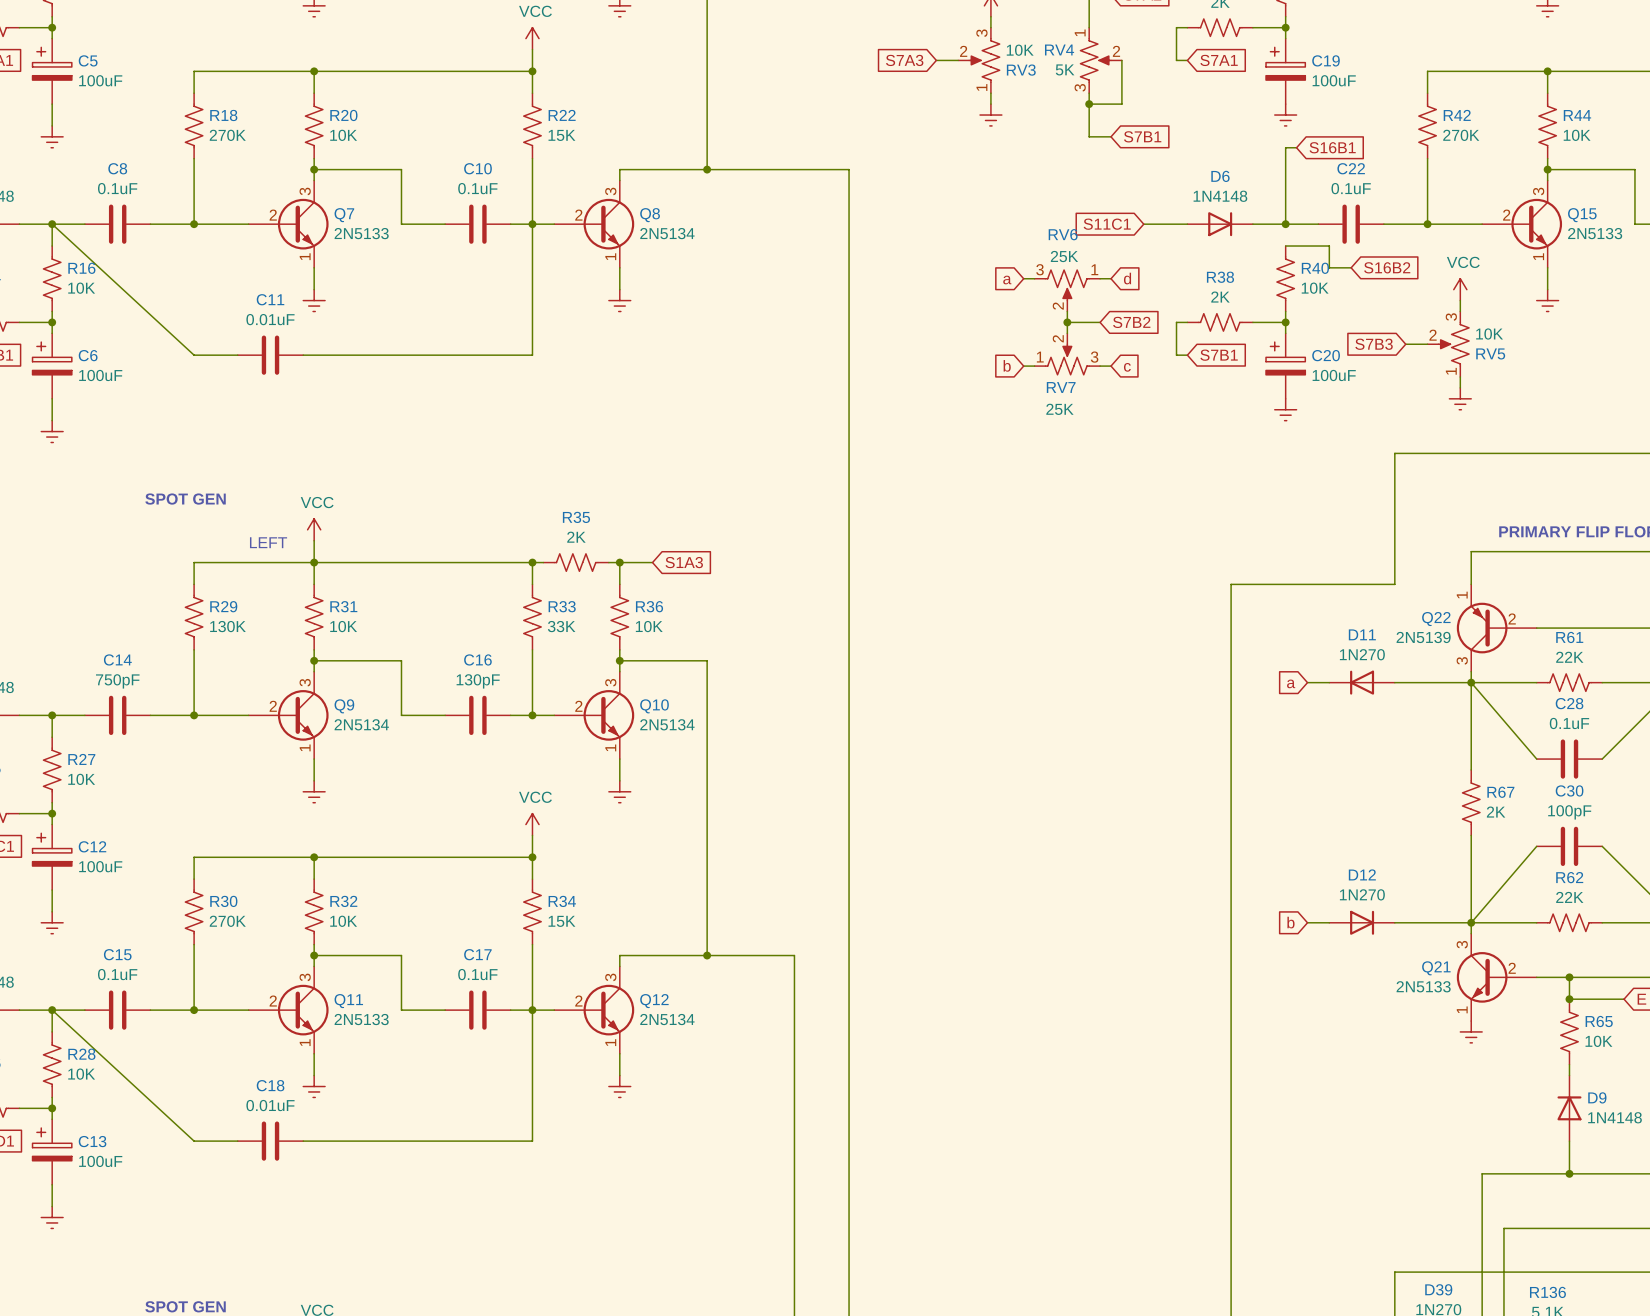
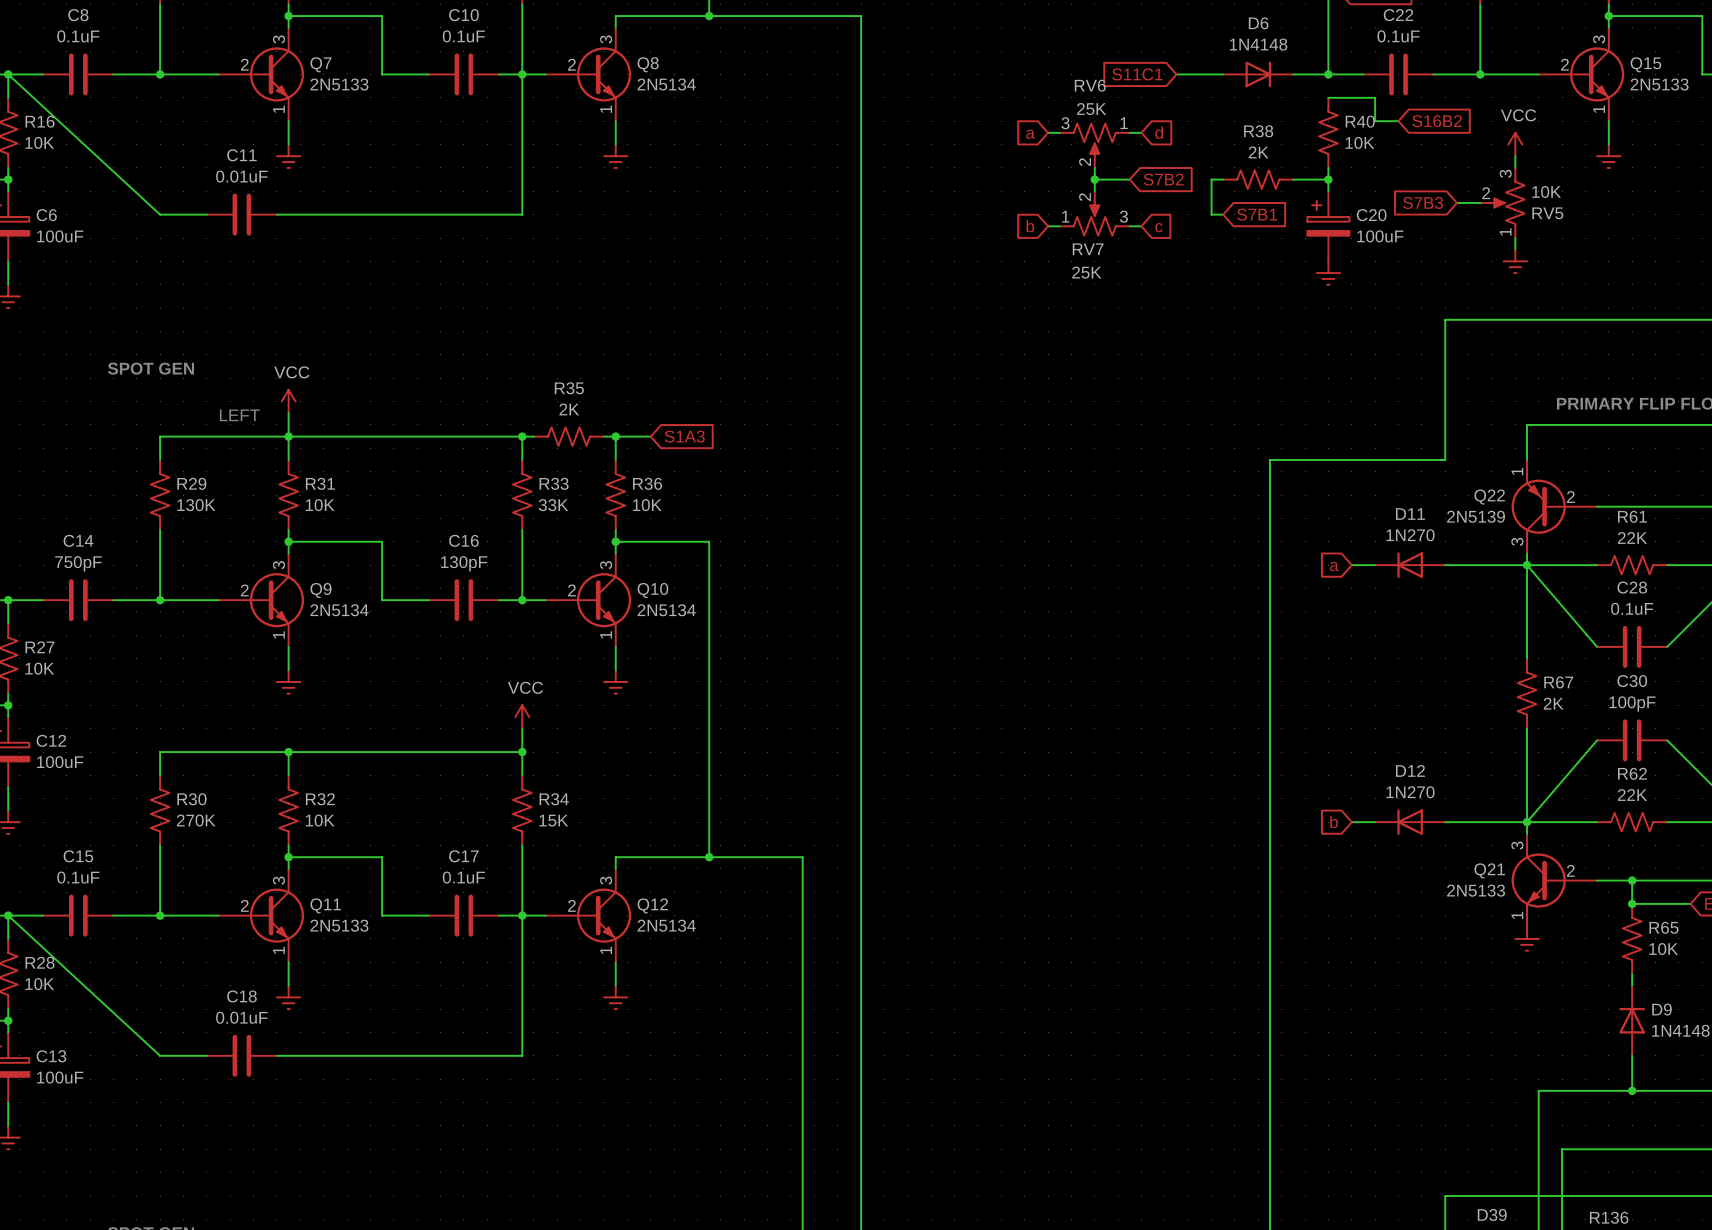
D12 rotation: 0° (1362, 922) -> 180° (1410, 822)

